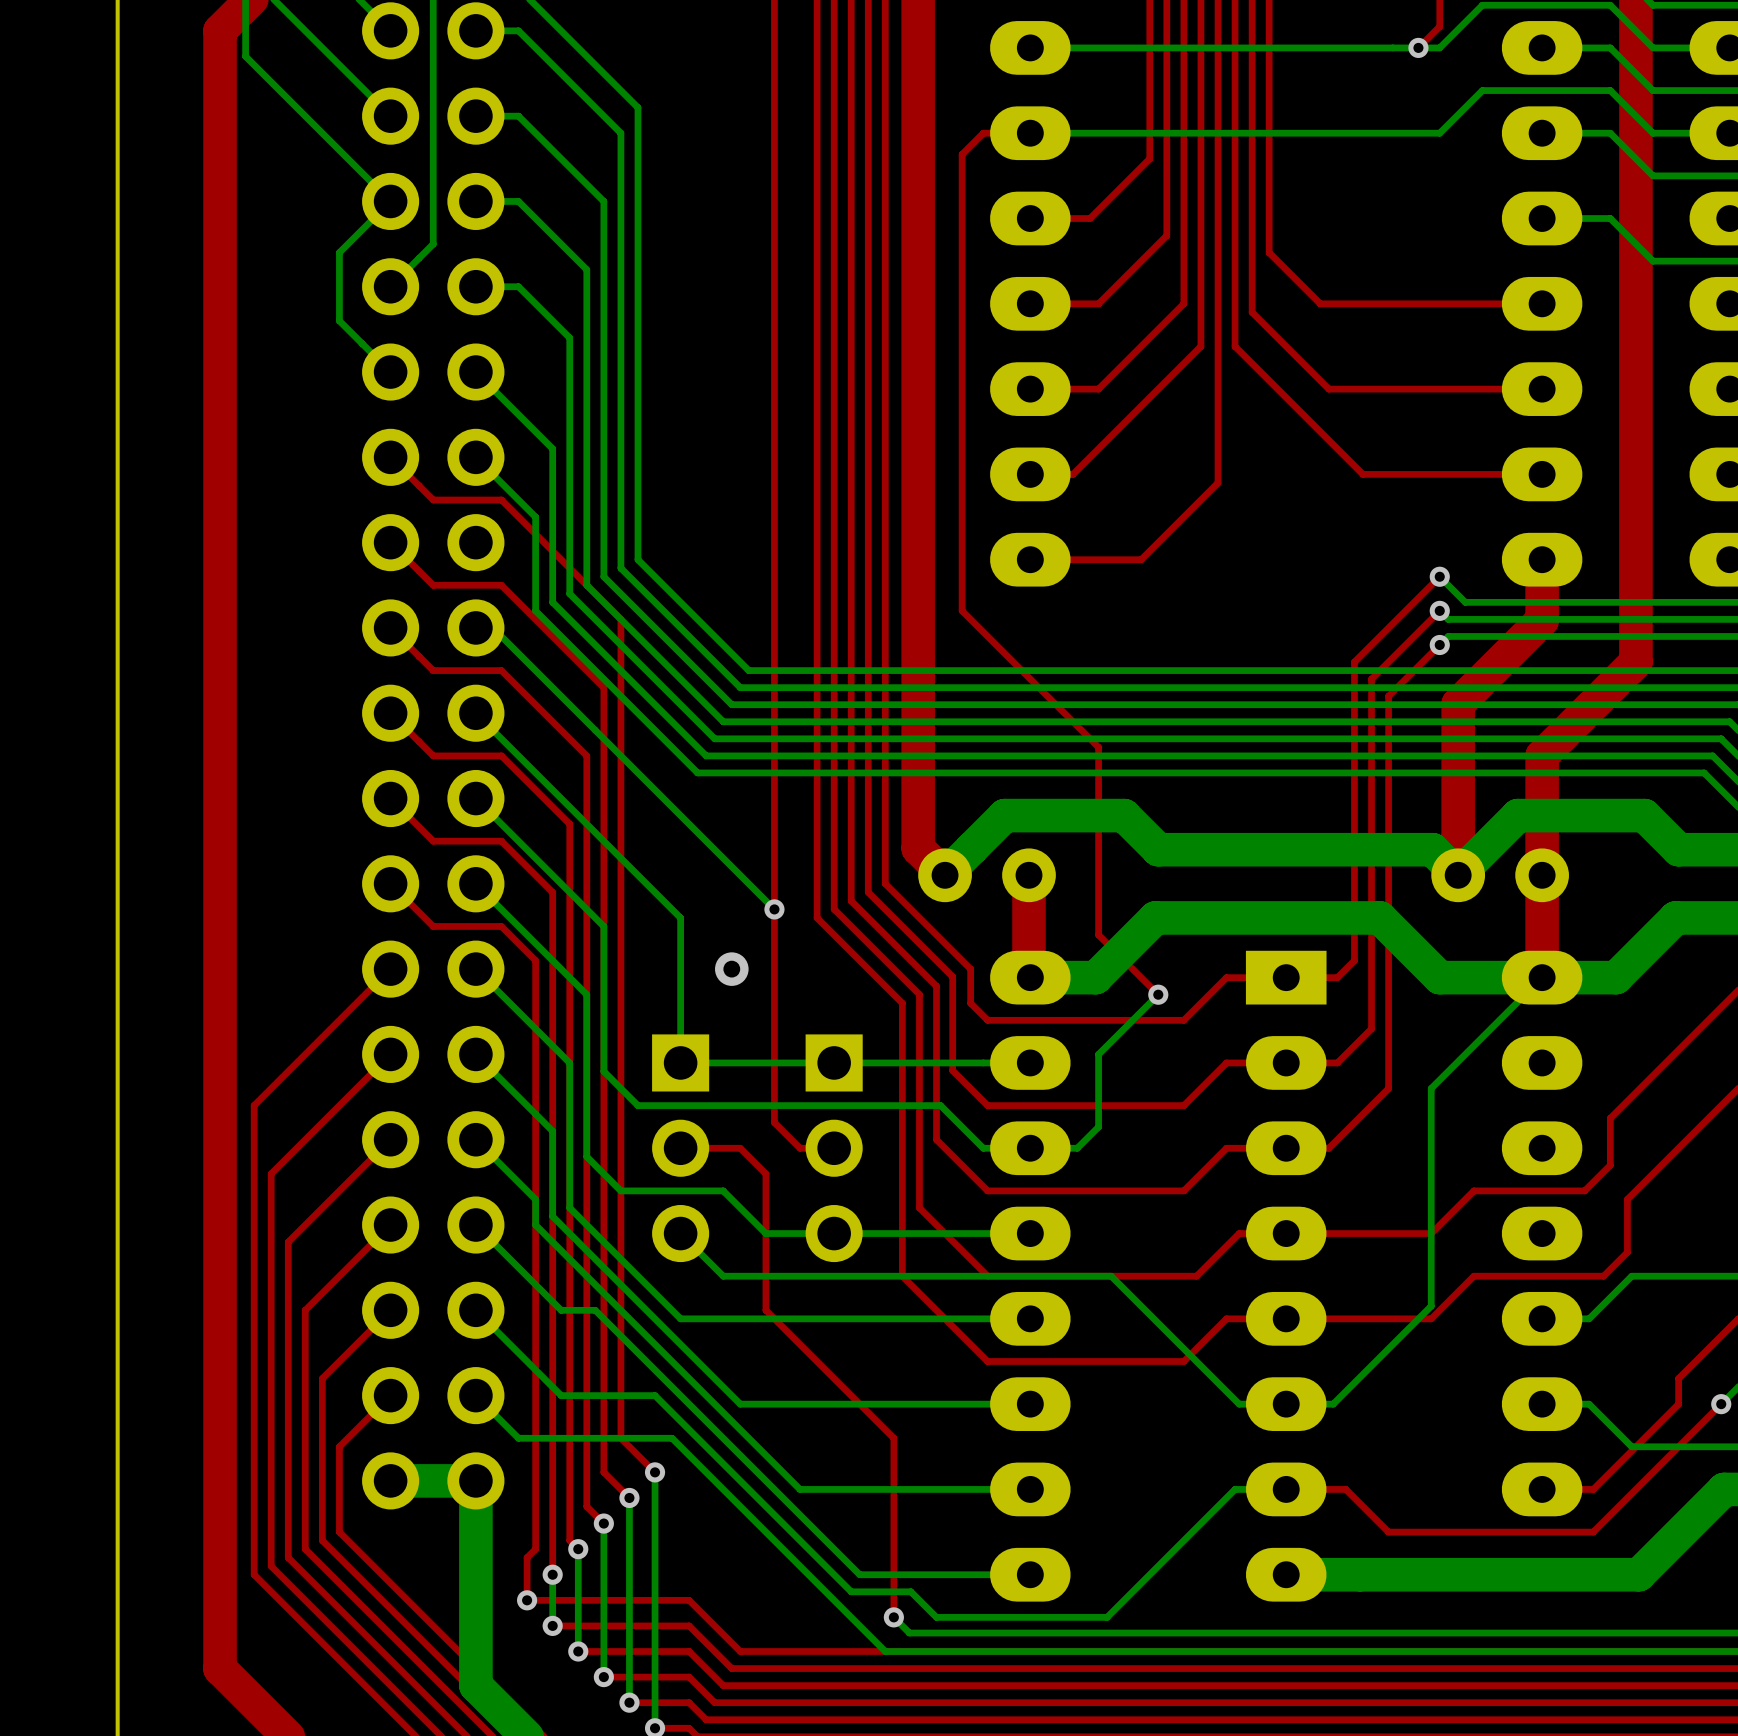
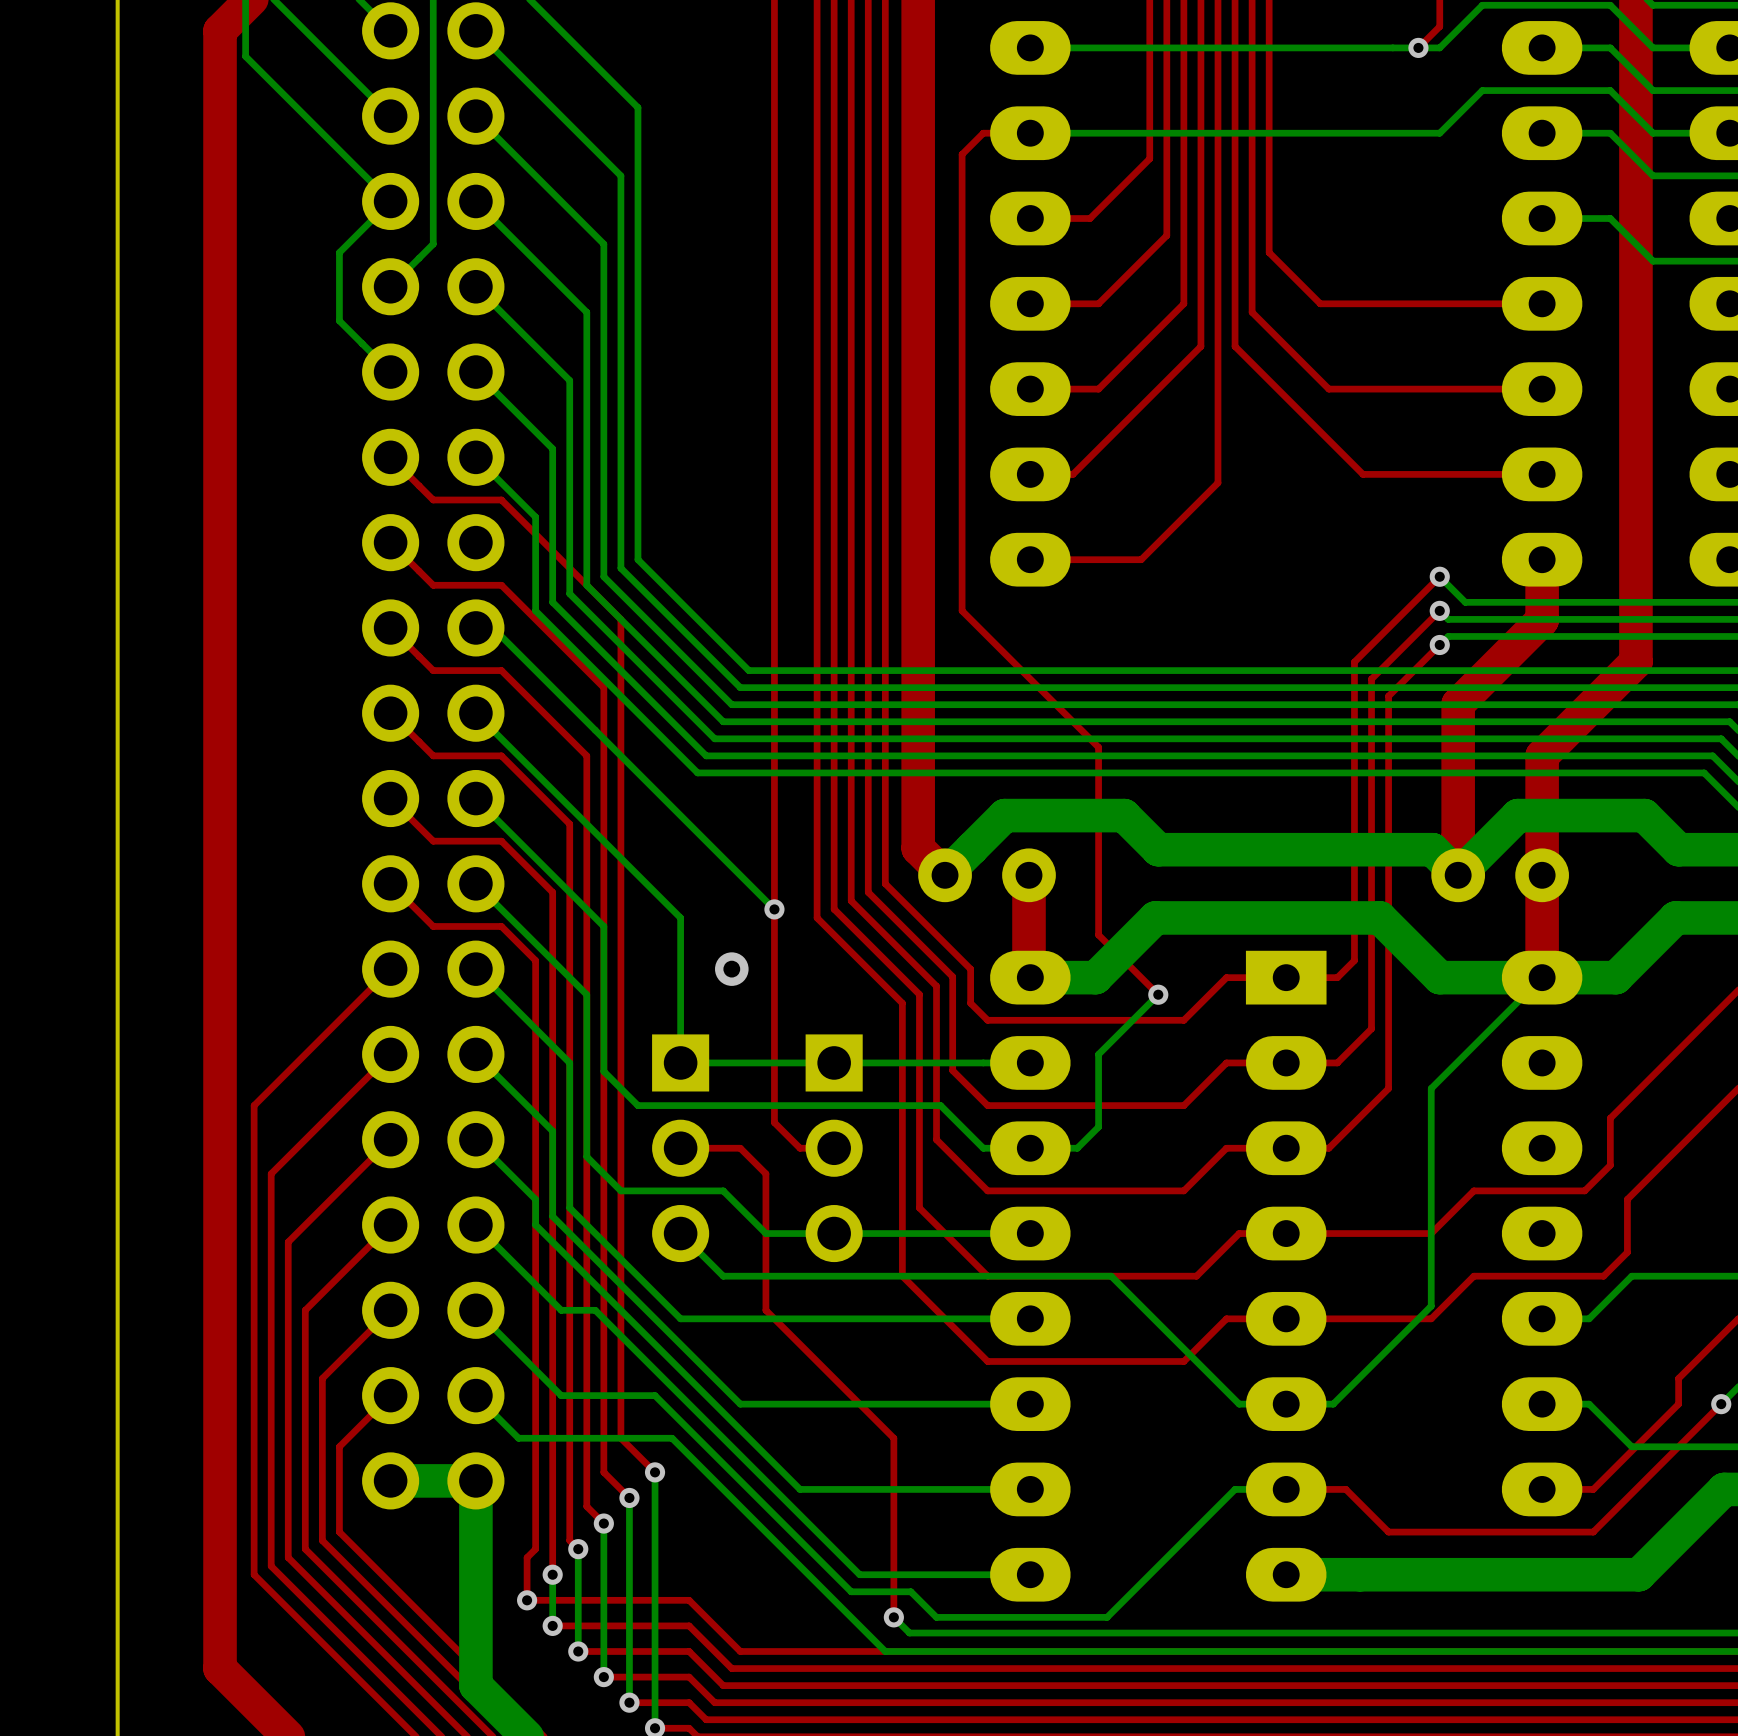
bottom track: (475, 30) (518, 30) (620, 133) (620, 175) -> (475, 30) (620, 175)
bottom track: (475, 116) (518, 116) (603, 201) (603, 244) -> (475, 116) (603, 244)
bottom track: (475, 201) (518, 201) (586, 269) (586, 312) -> (475, 201) (586, 312)
bottom track: (475, 286) (518, 286) (569, 337) (569, 380) -> (475, 286) (569, 380)

